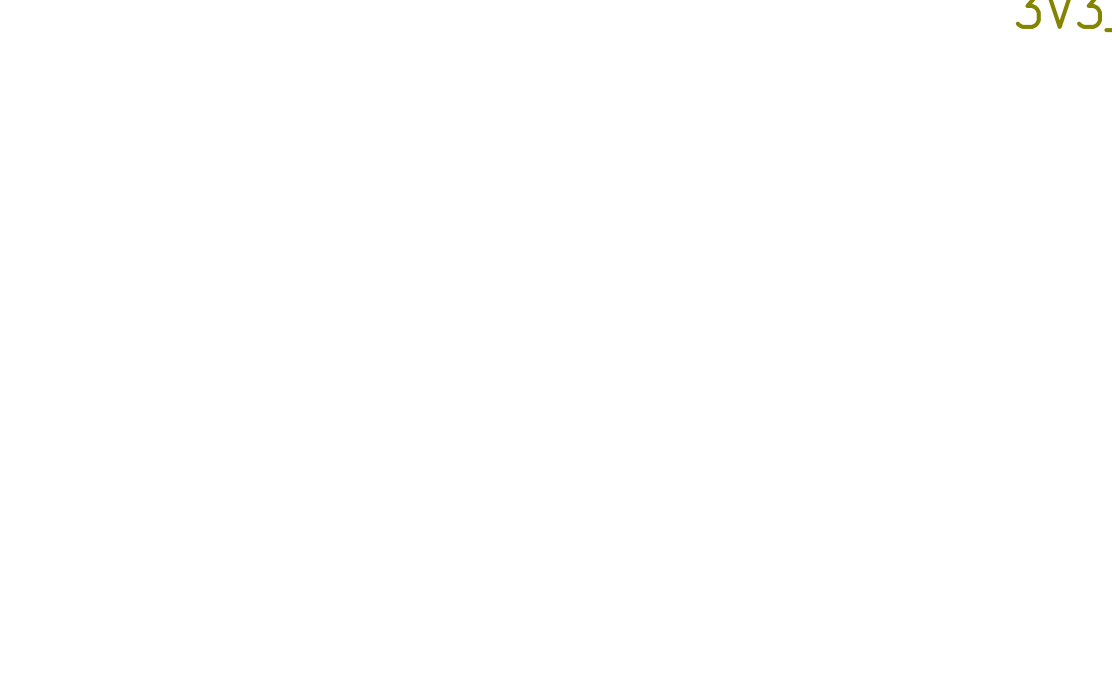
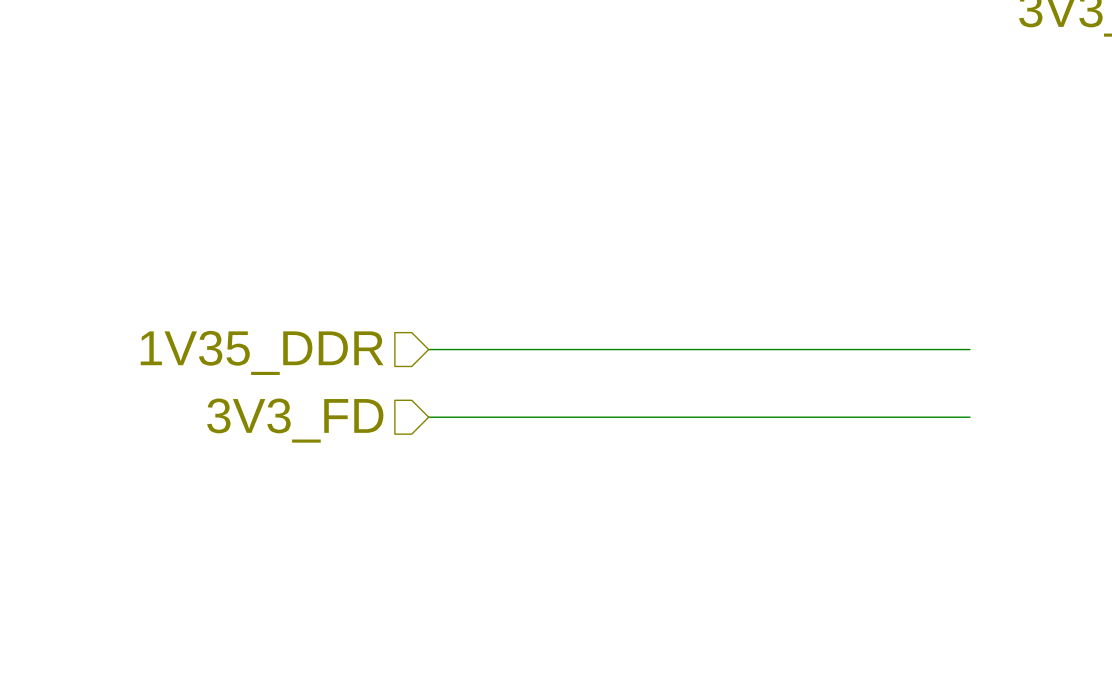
hierarchical label: none -> 1V35_DDR (262, 352)
wire: none -> (428, 349) (970, 349)
hierarchical label: none -> 3V3_FD (295, 420)
wire: none -> (428, 417) (970, 417)

